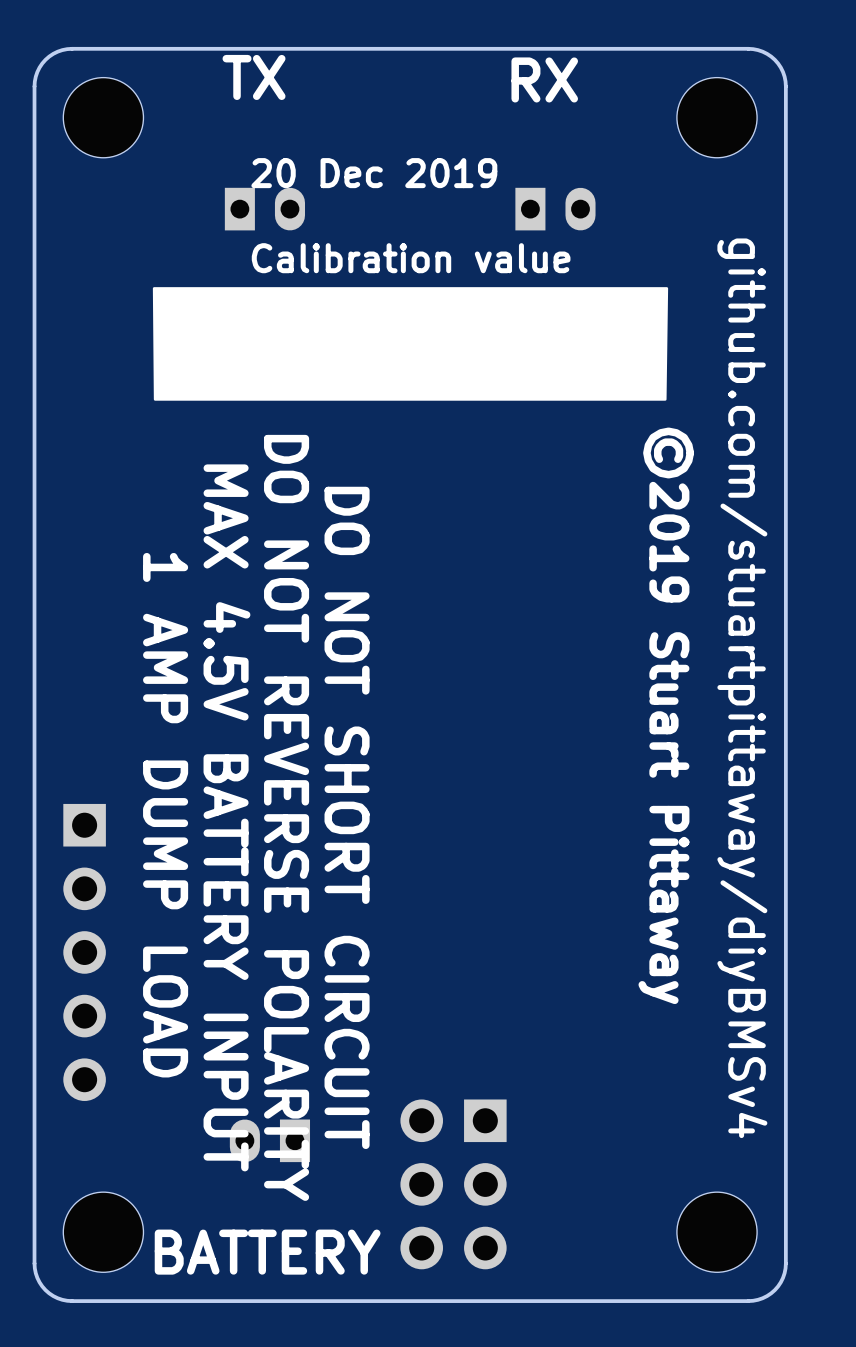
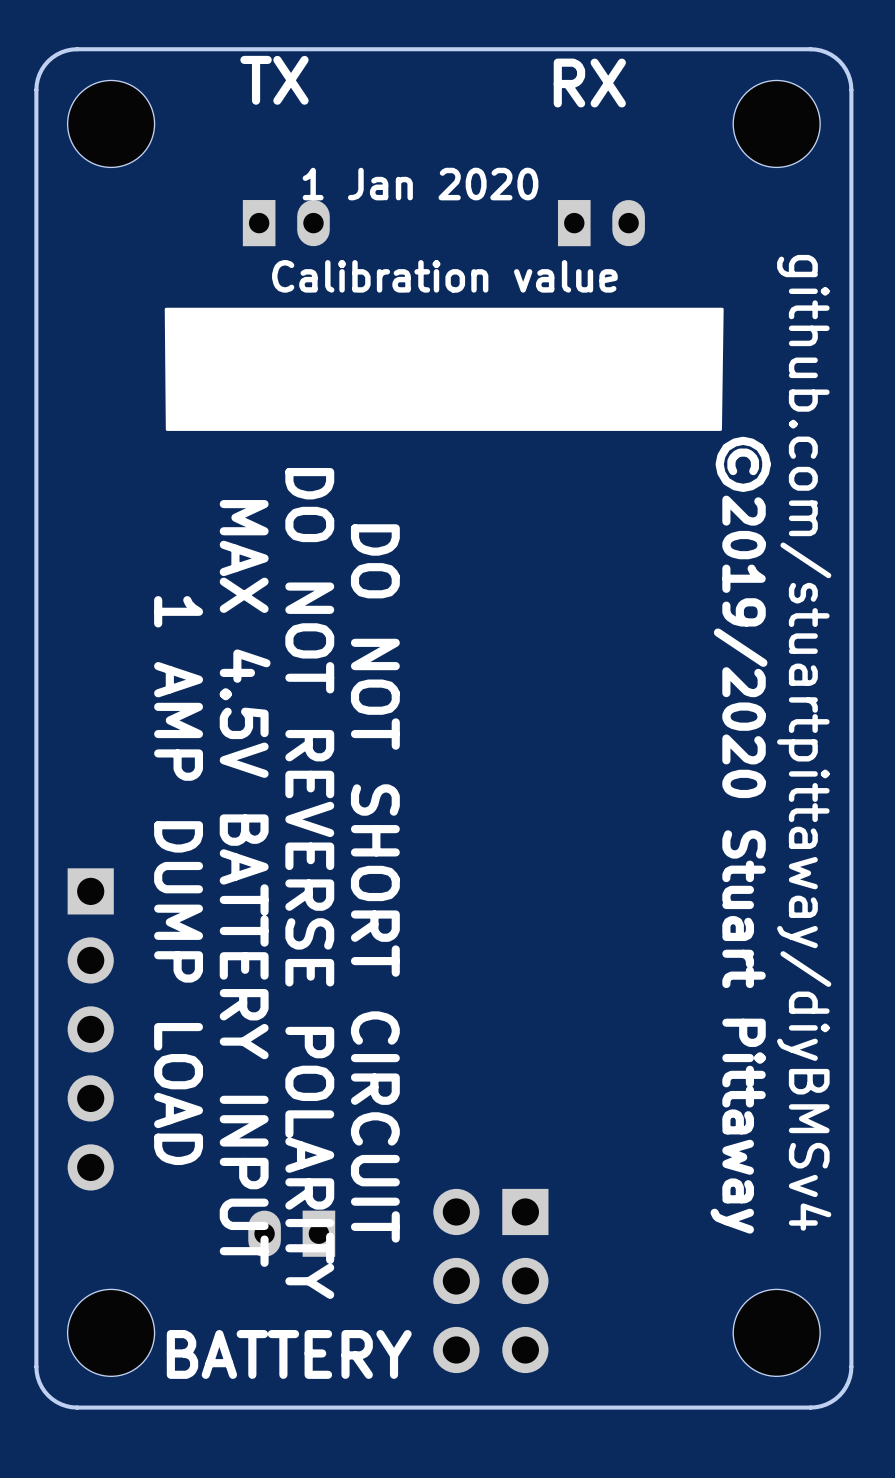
text: 20 Dec 2019 (374, 173) -> 1 Jan 2020 (420, 184)
text: ©2019 Stuart Pittaway (666, 715) -> ©2019/2020 Stuart Pittaway (740, 835)

